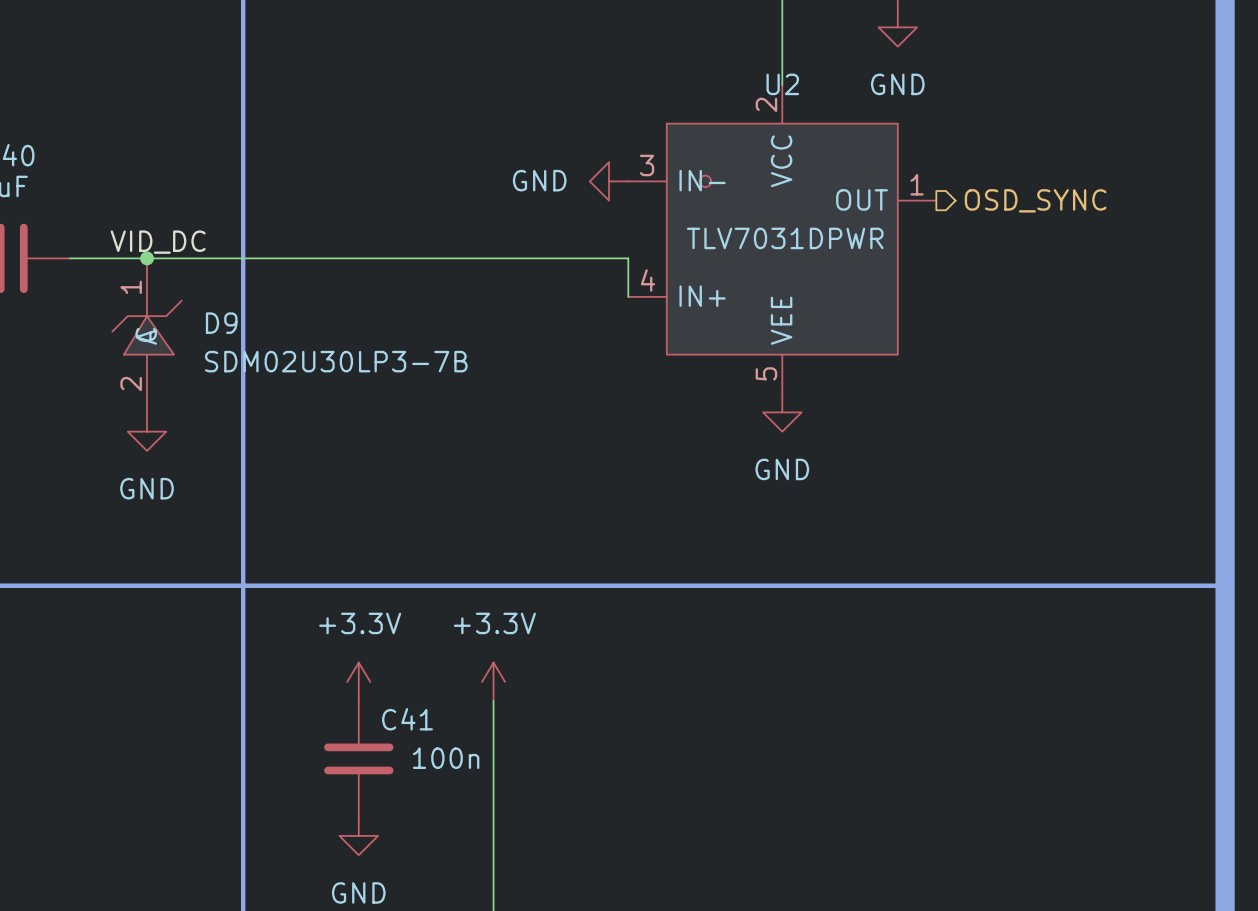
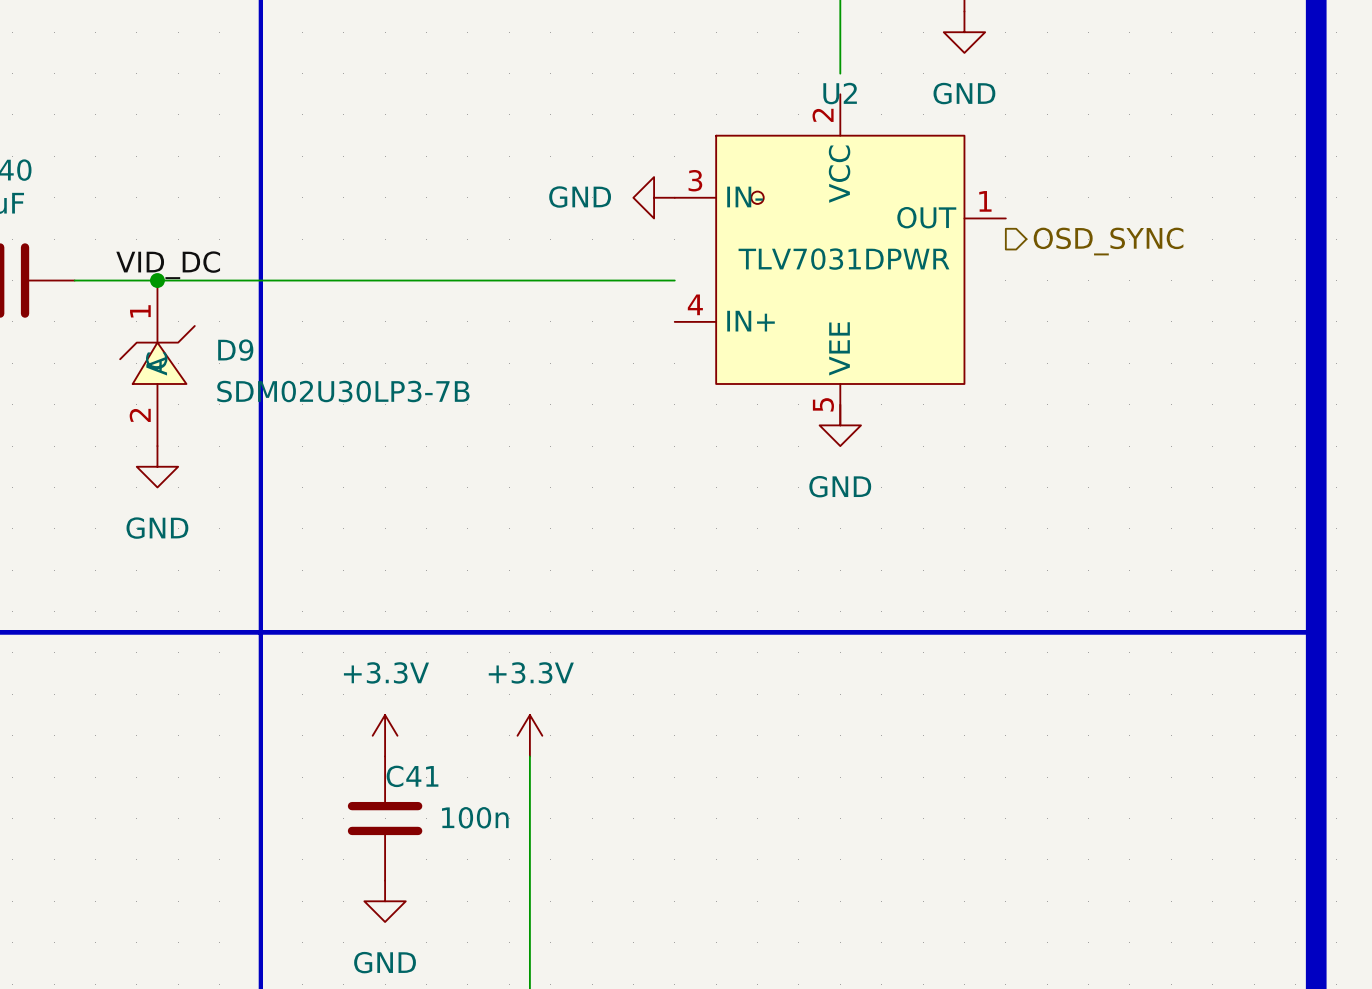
wire: (782, 65) (782, 85) -> none
hierarchical label position: OSD_SYNC (1035, 200) -> OSD_SYNC (1108, 241)
wire: (628, 258) (628, 296) -> none
power symbol position: GND (782, 412) -> GND (840, 425)
C41 name position: C41 (407, 719) -> C41 (412, 776)

